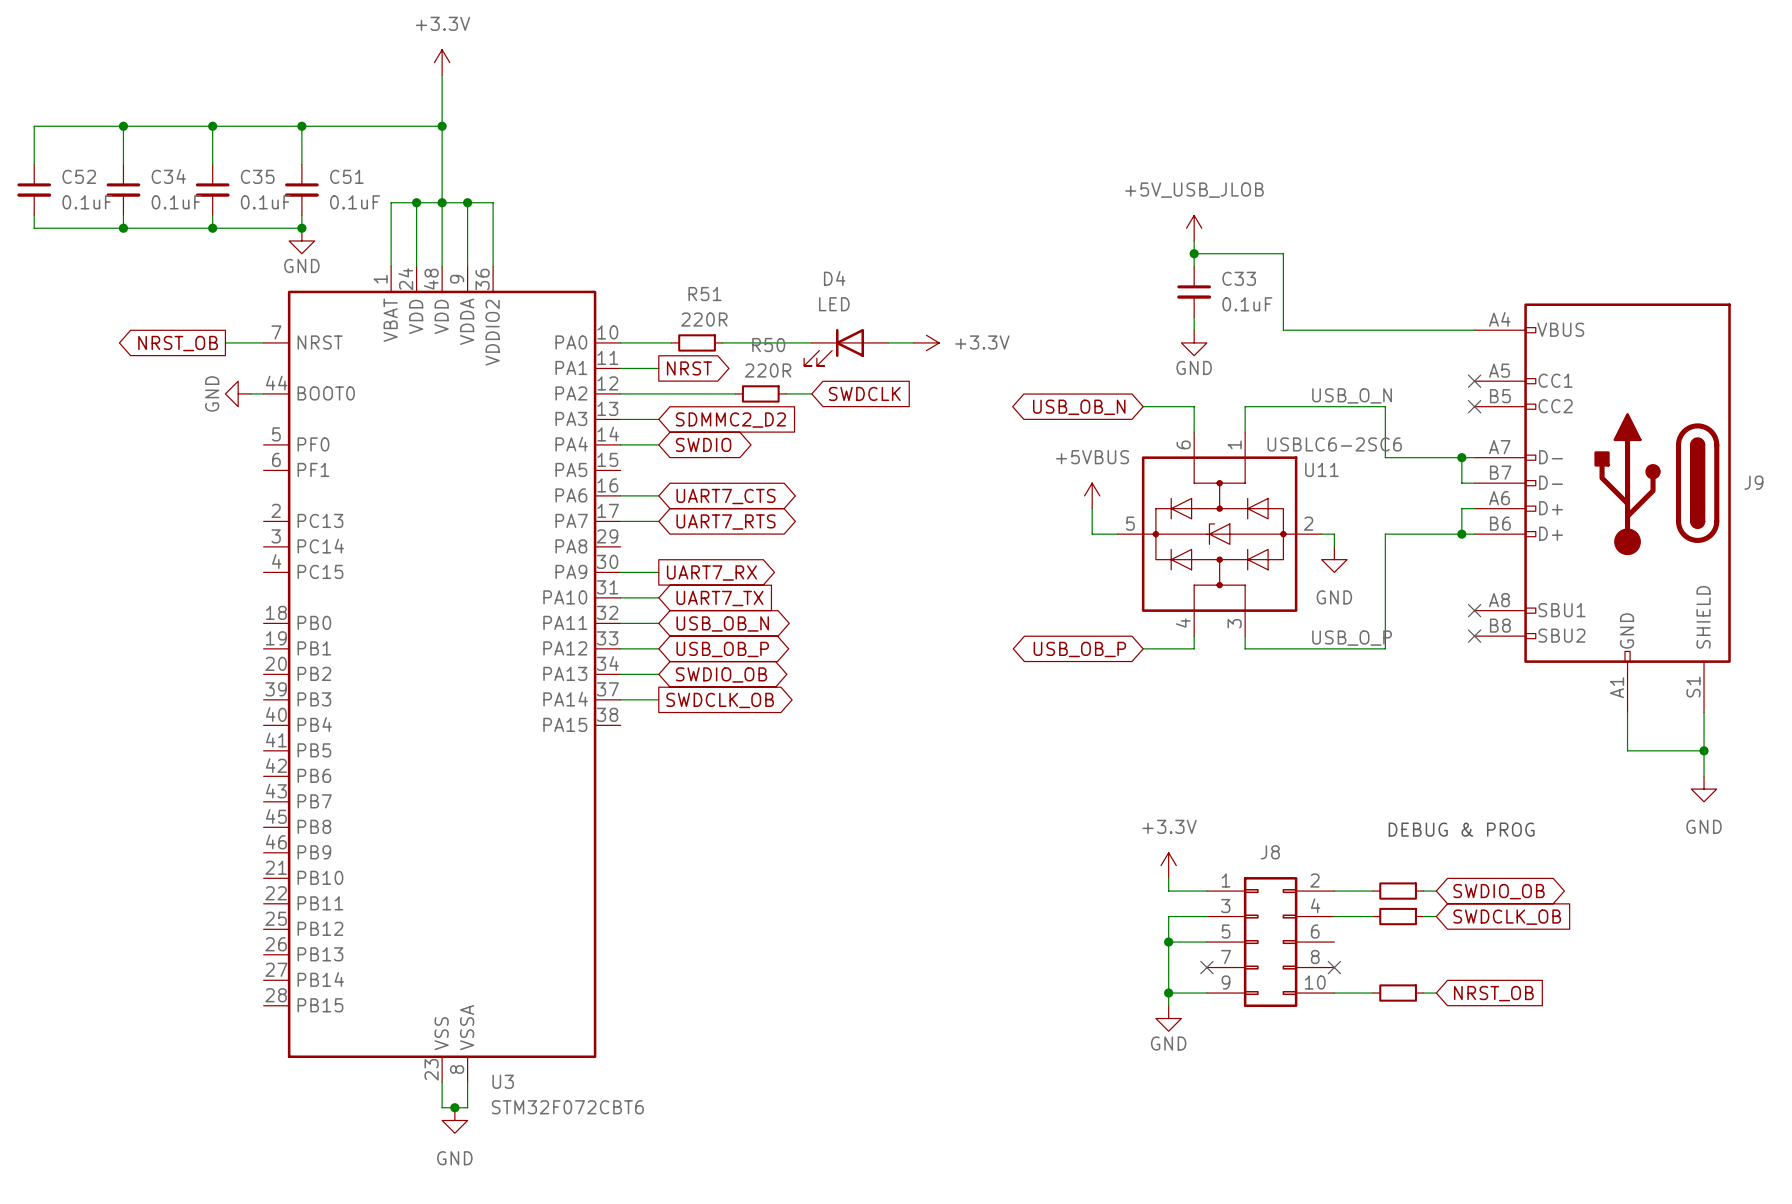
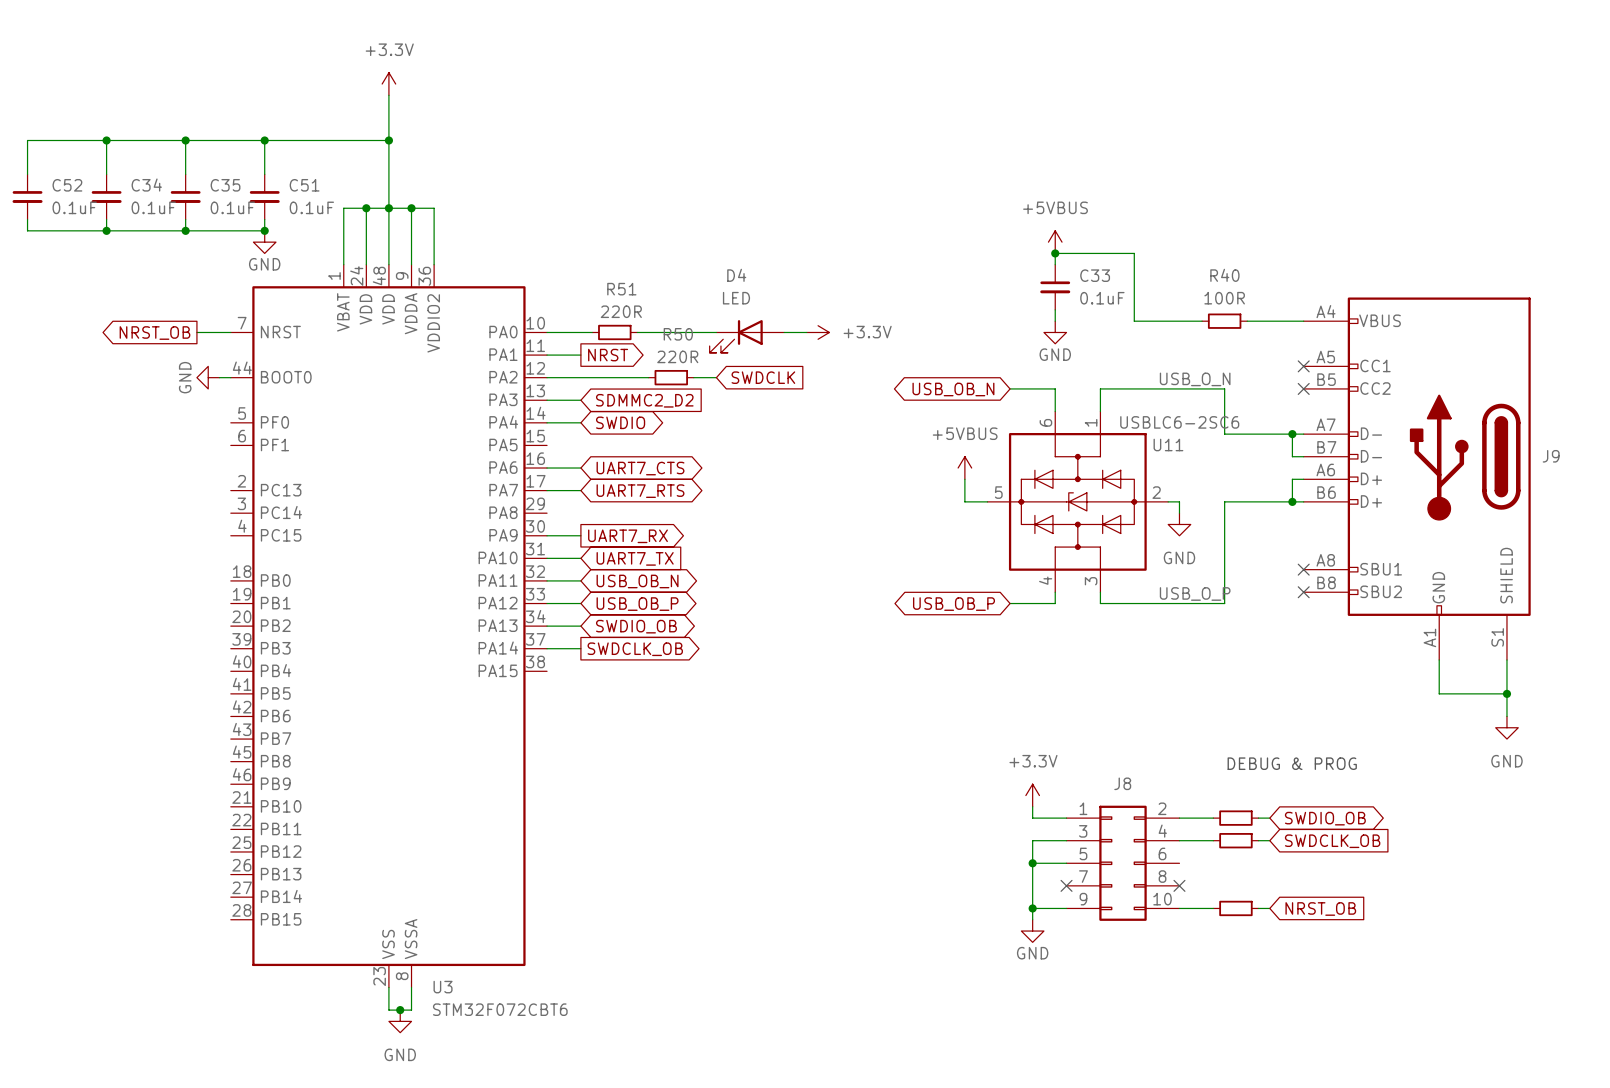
power symbol: +5V_USB_JLOB (1194, 228) -> none
power symbol: none -> +5VBUS (1055, 242)
wire: (1359, 330) (1410, 330) -> none
R40: none -> 100R (1224, 321)

